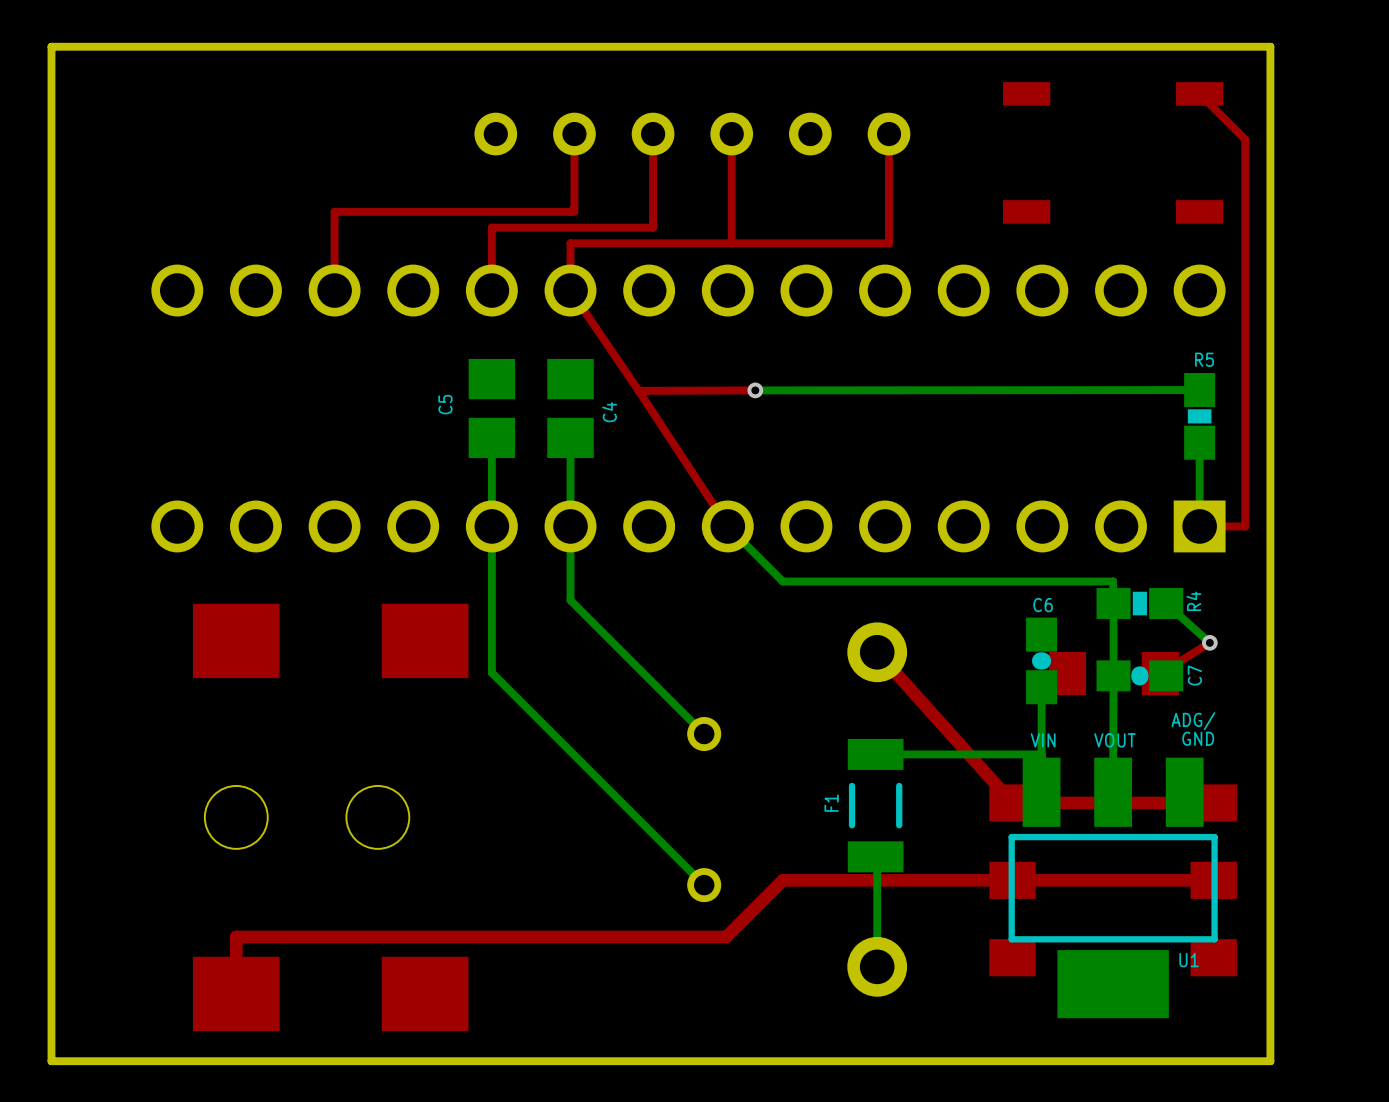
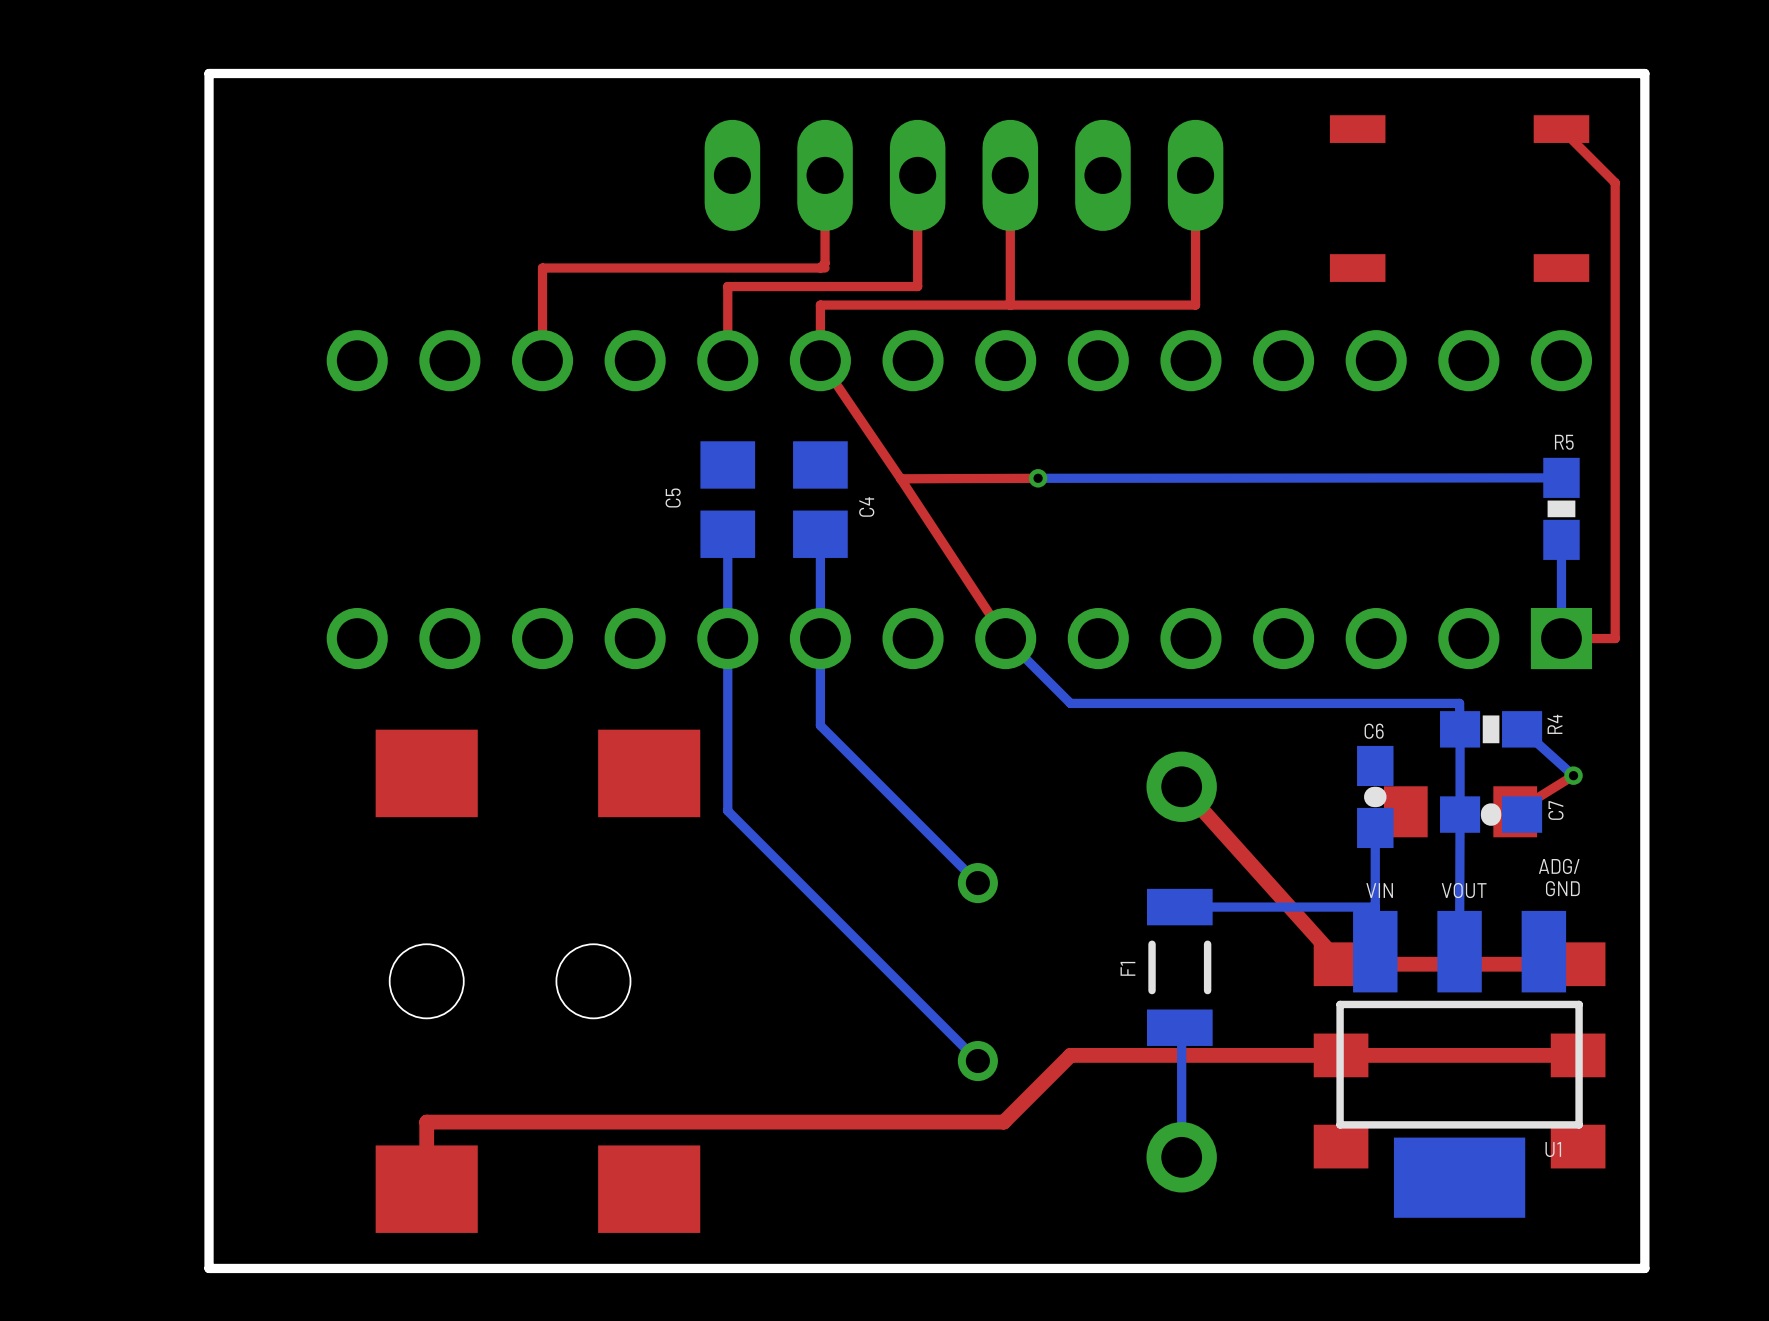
part footprint: [474, 112, 911, 156] -> [704, 119, 1224, 231]

